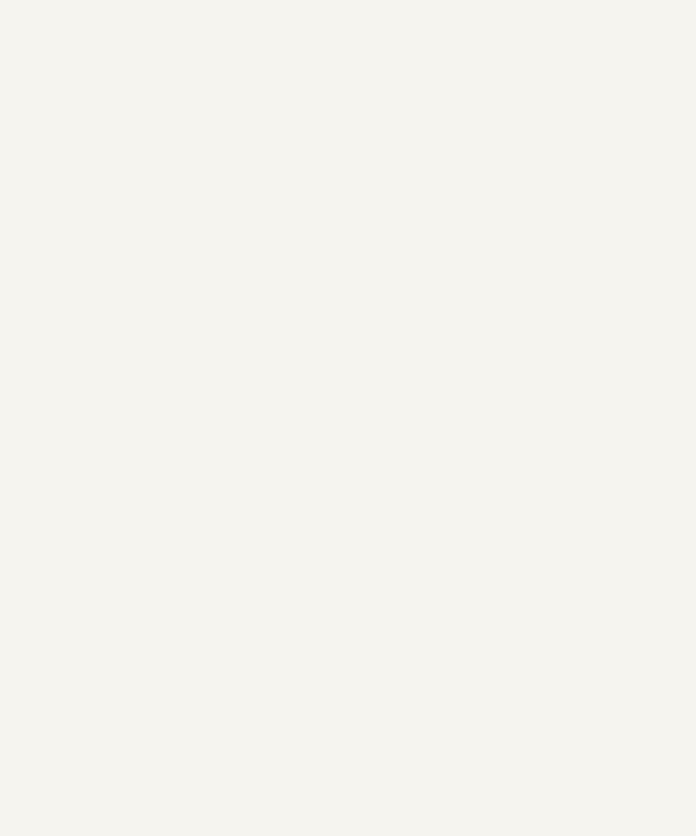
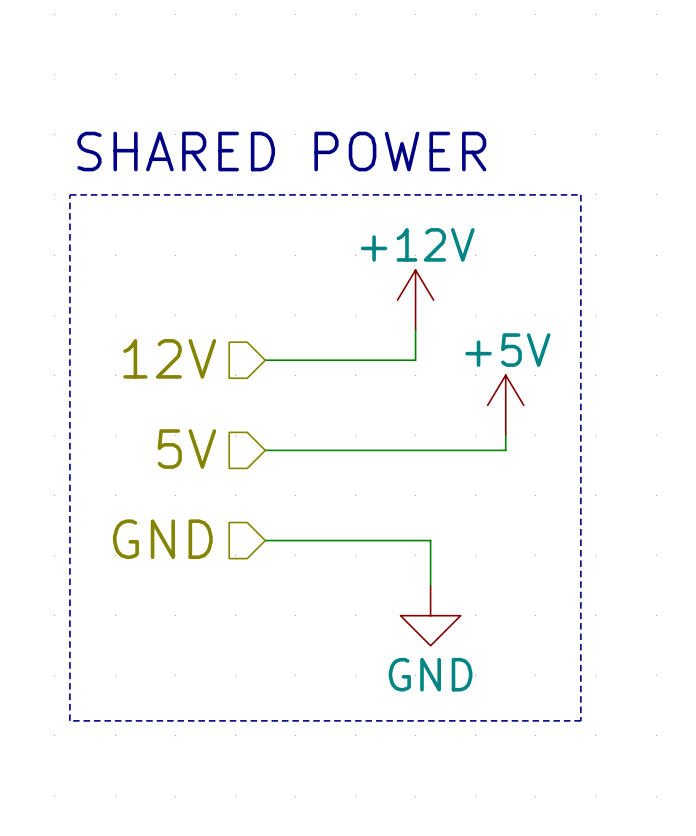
text: none -> SHARED POWER (281, 151)
line: none -> (69, 194) (580, 194) (580, 720) (69, 720) (69, 194)
power symbol: none -> +12V (415, 300)
wire: none -> (415, 330) (415, 360) (265, 360)
hierarchical label: none -> 12V (169, 358)
power symbol: none -> +5V (505, 405)
wire: none -> (505, 435) (505, 450) (265, 450)
hierarchical label: none -> 5V (186, 449)
hierarchical label: none -> GND (162, 539)
wire: none -> (265, 540) (430, 540) (430, 585)
power symbol: none -> GND (430, 615)

